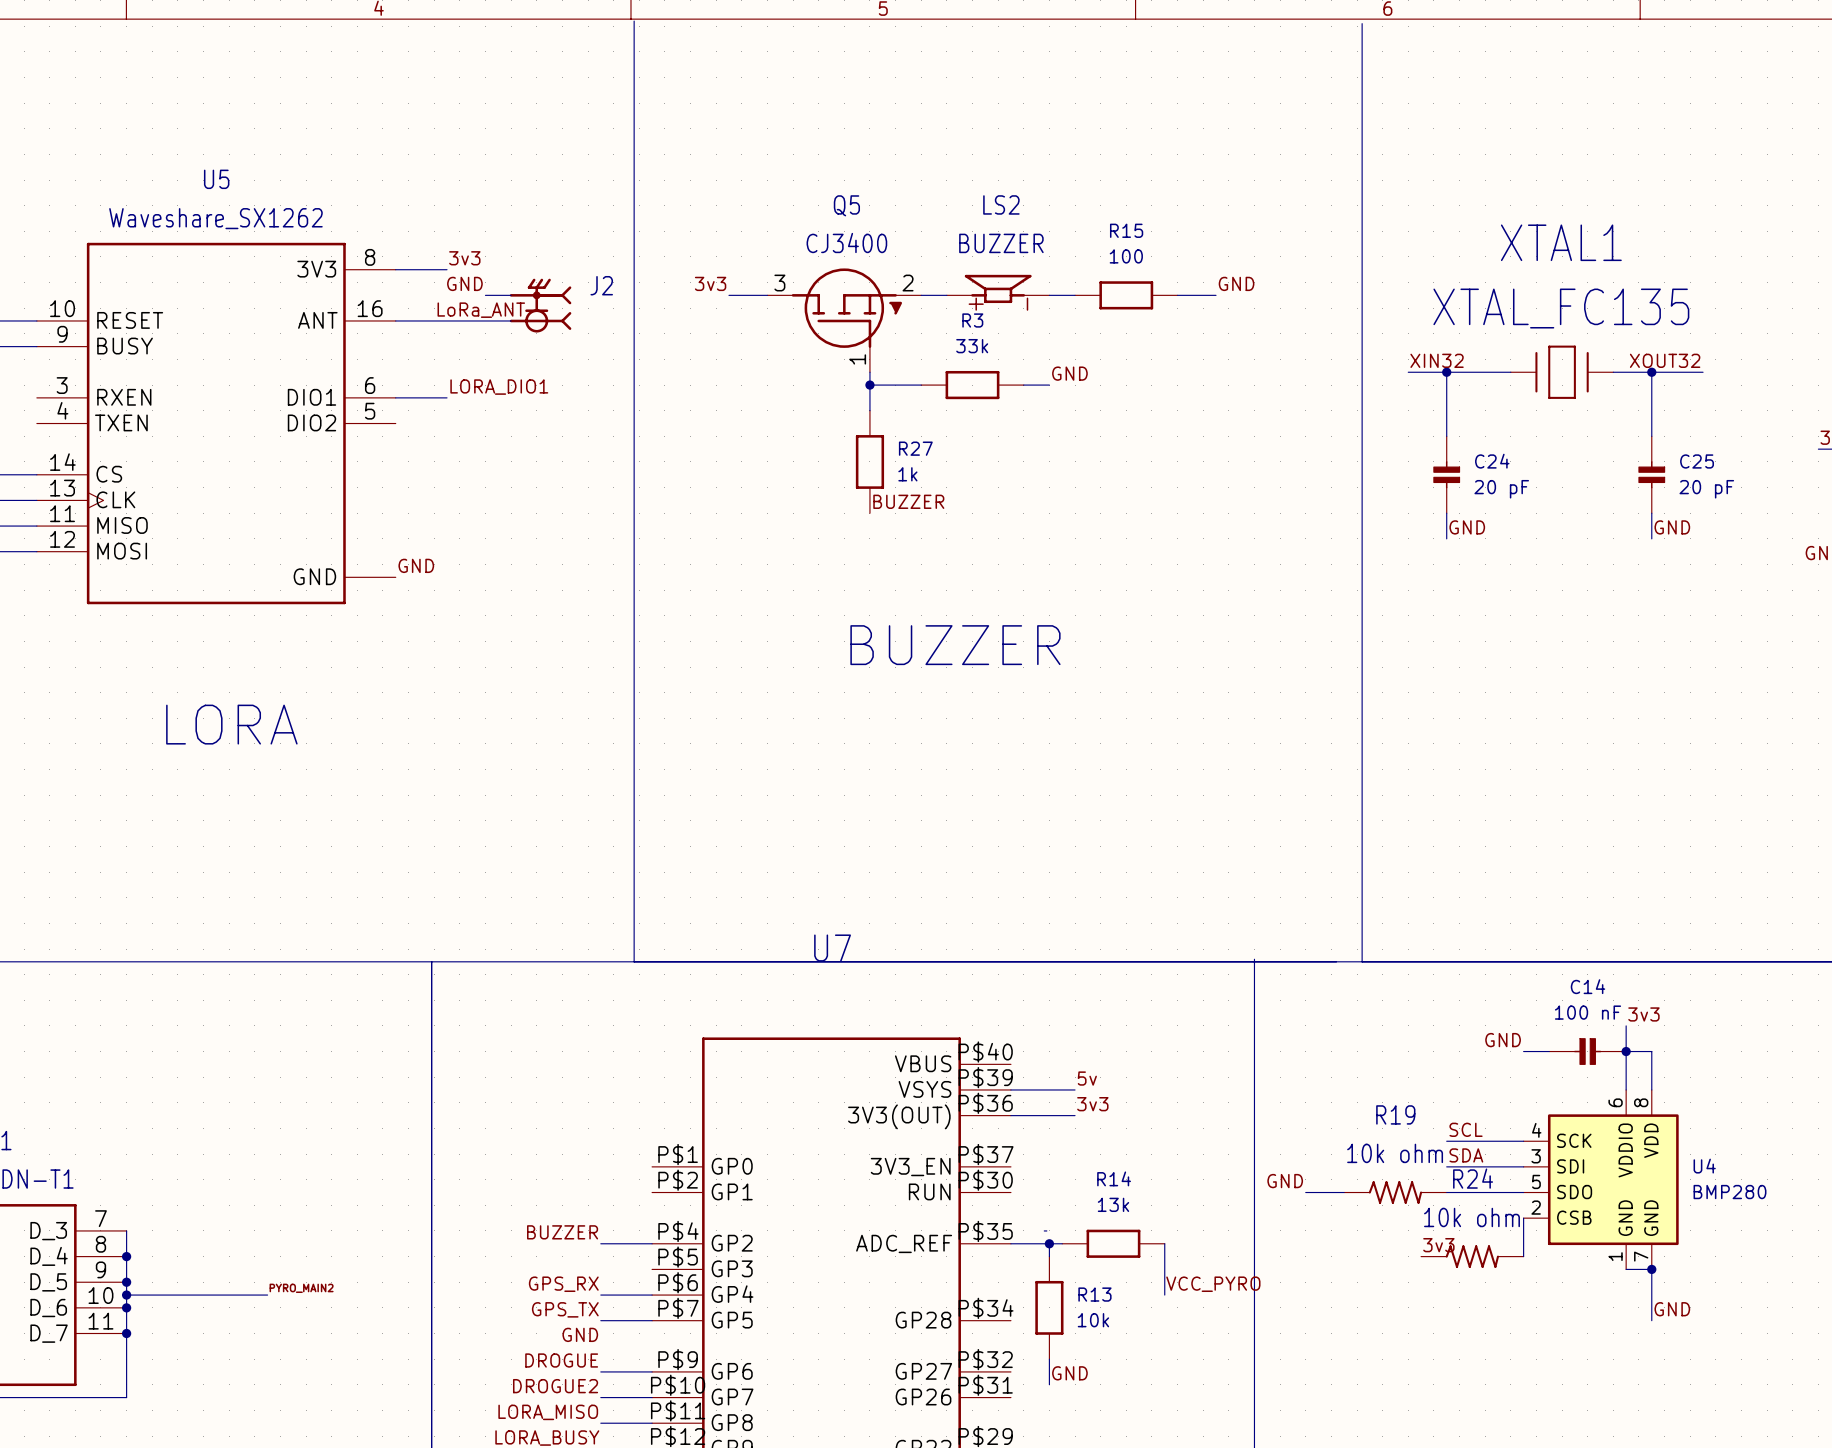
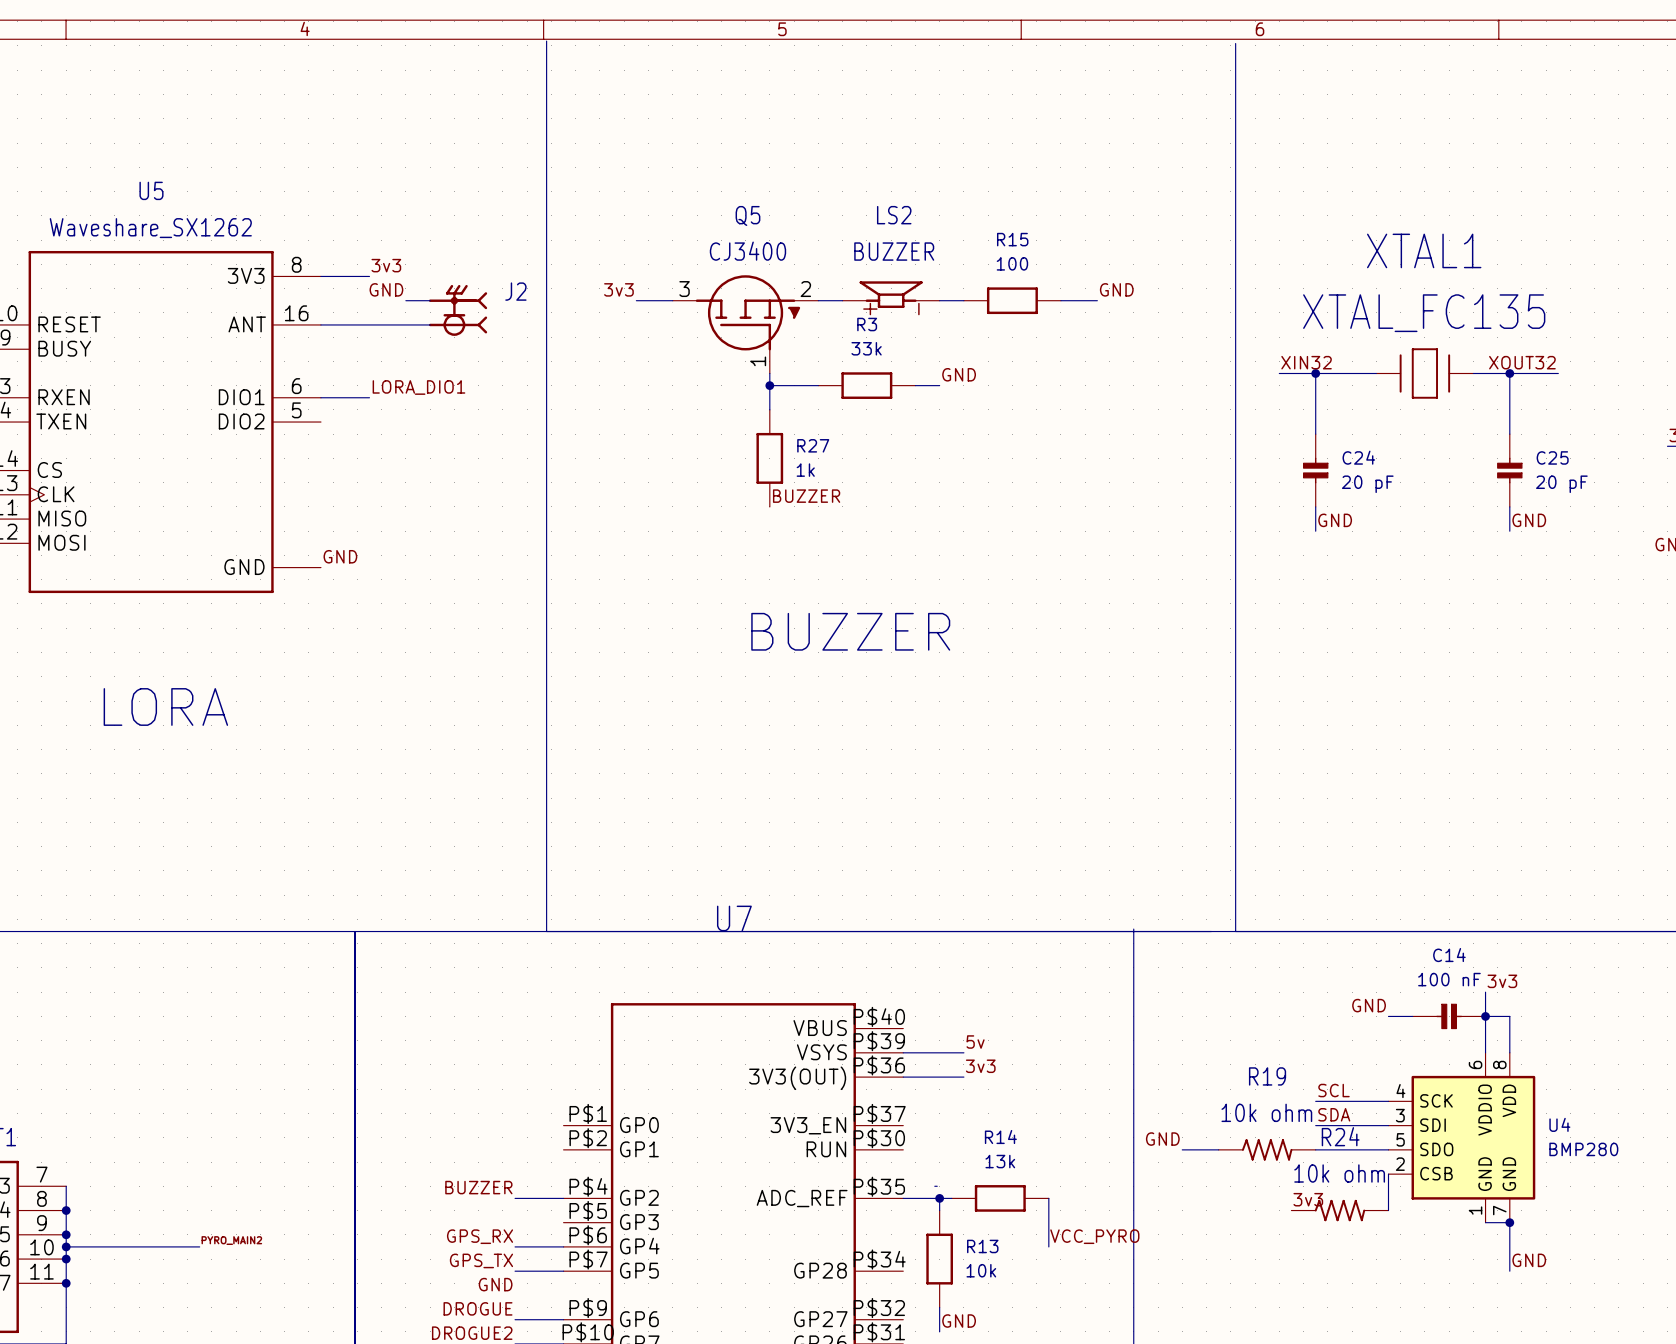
label: LoRa_ANT (481, 310) -> none

